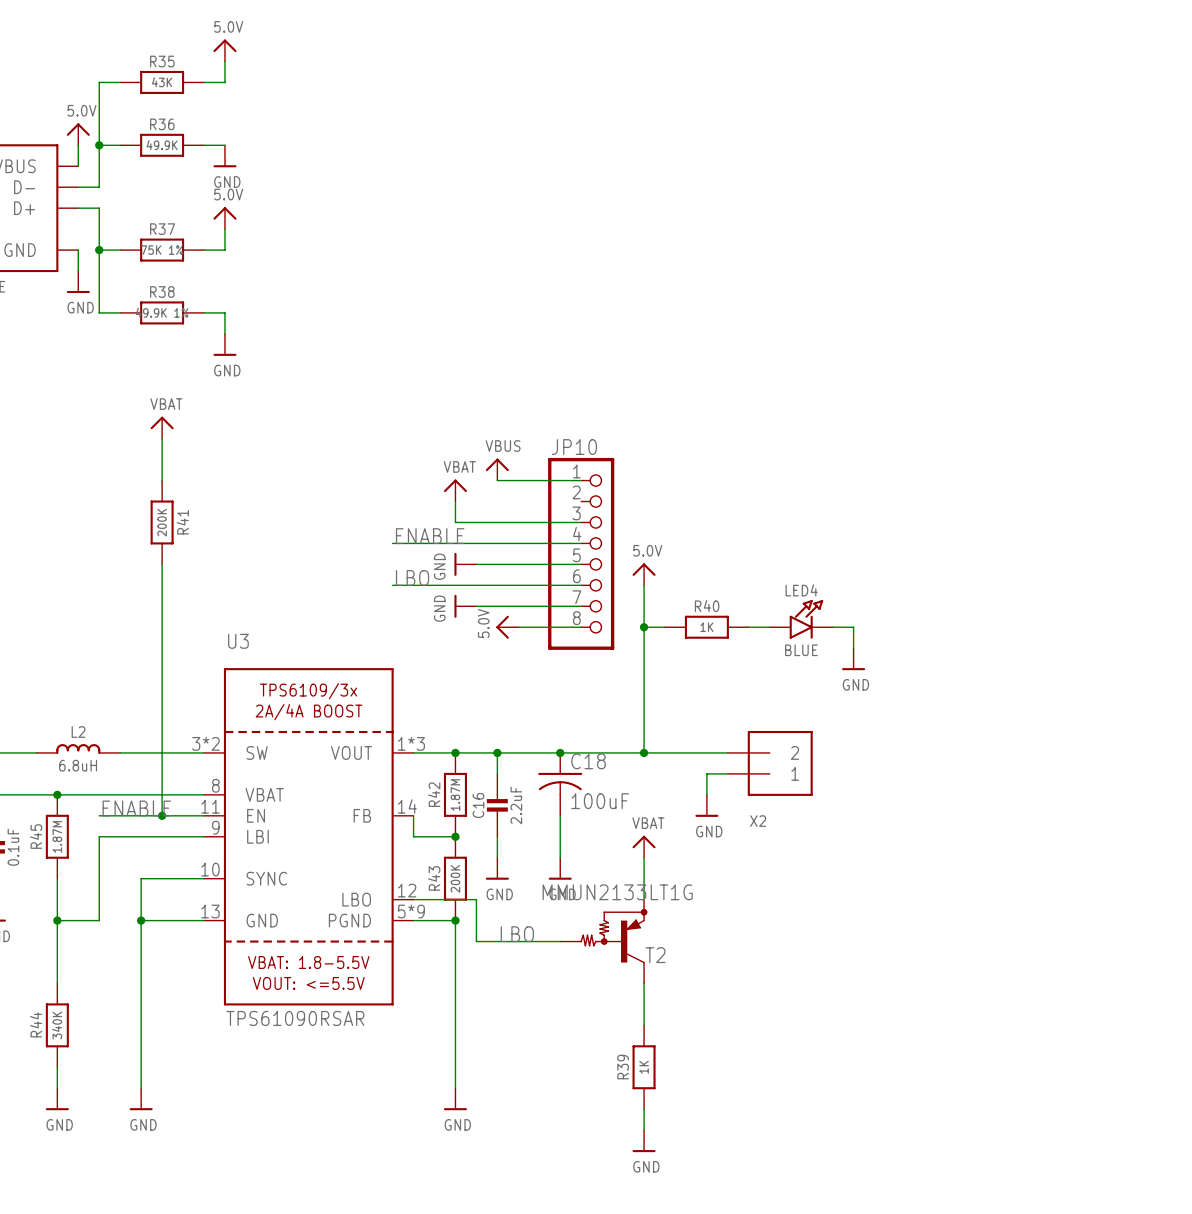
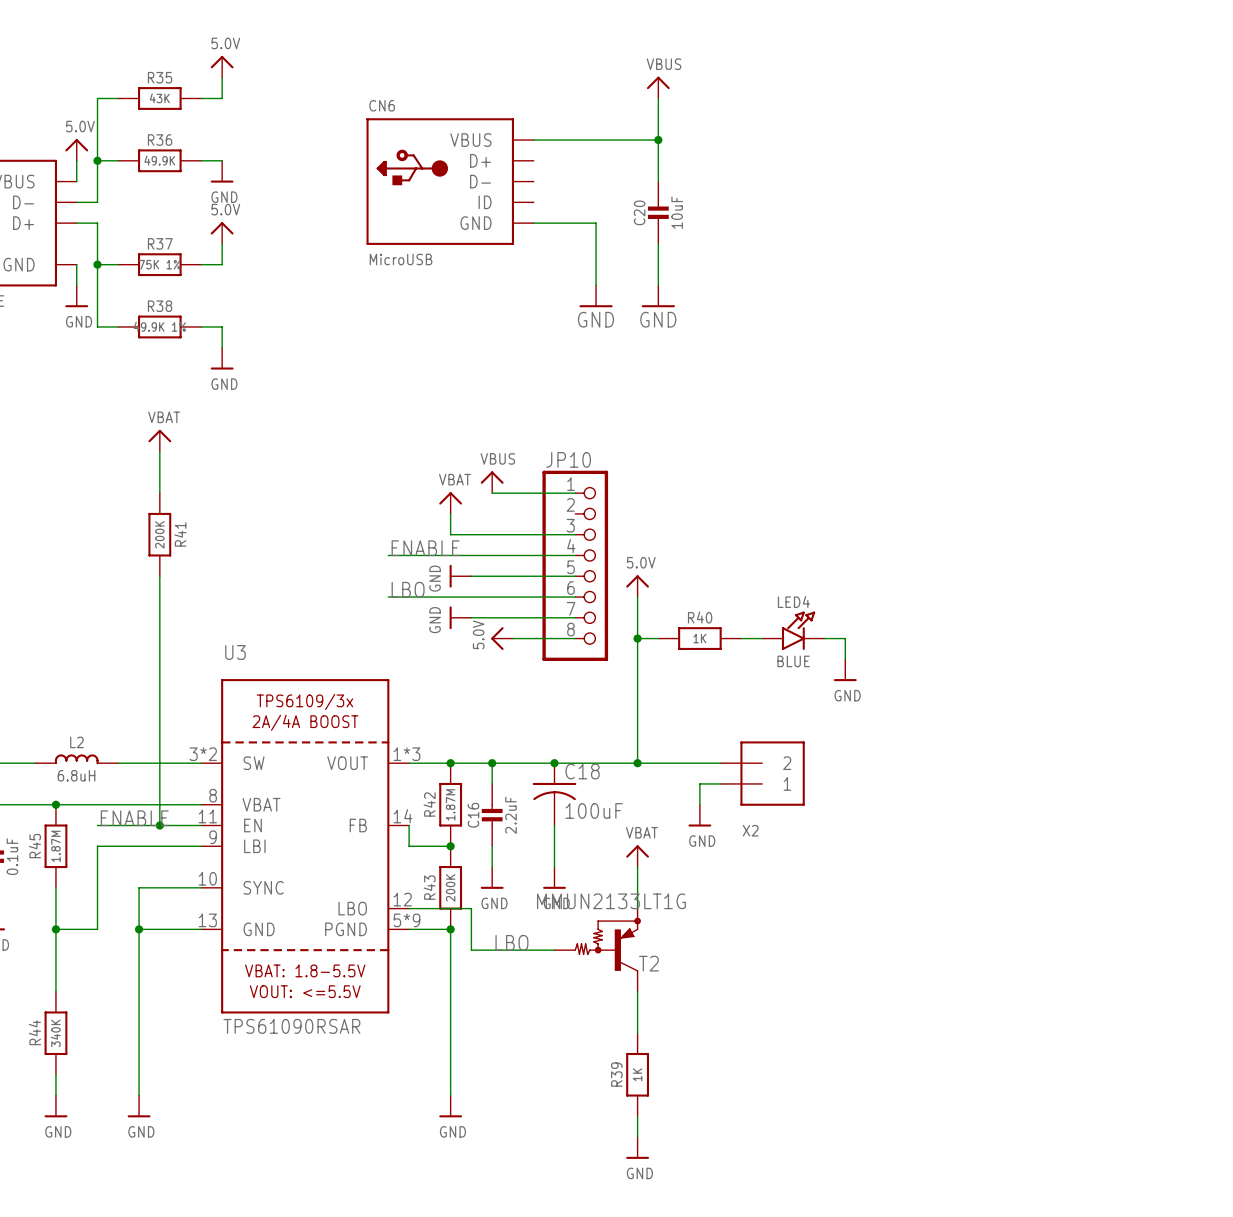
power symbol: none -> VBUS (658, 87)
wire: none -> (658, 98) (658, 181)
wire: none -> (533, 140) (658, 140)
junction: none -> (658, 140)
CN6: none -> MicroUSB (449, 181)
C20: none -> 10uF (658, 212)
wire: none -> (533, 223) (596, 223) (596, 285)
wire: none -> (658, 243) (658, 285)
power symbol: none -> GND (596, 296)
power symbol: none -> GND (658, 296)

